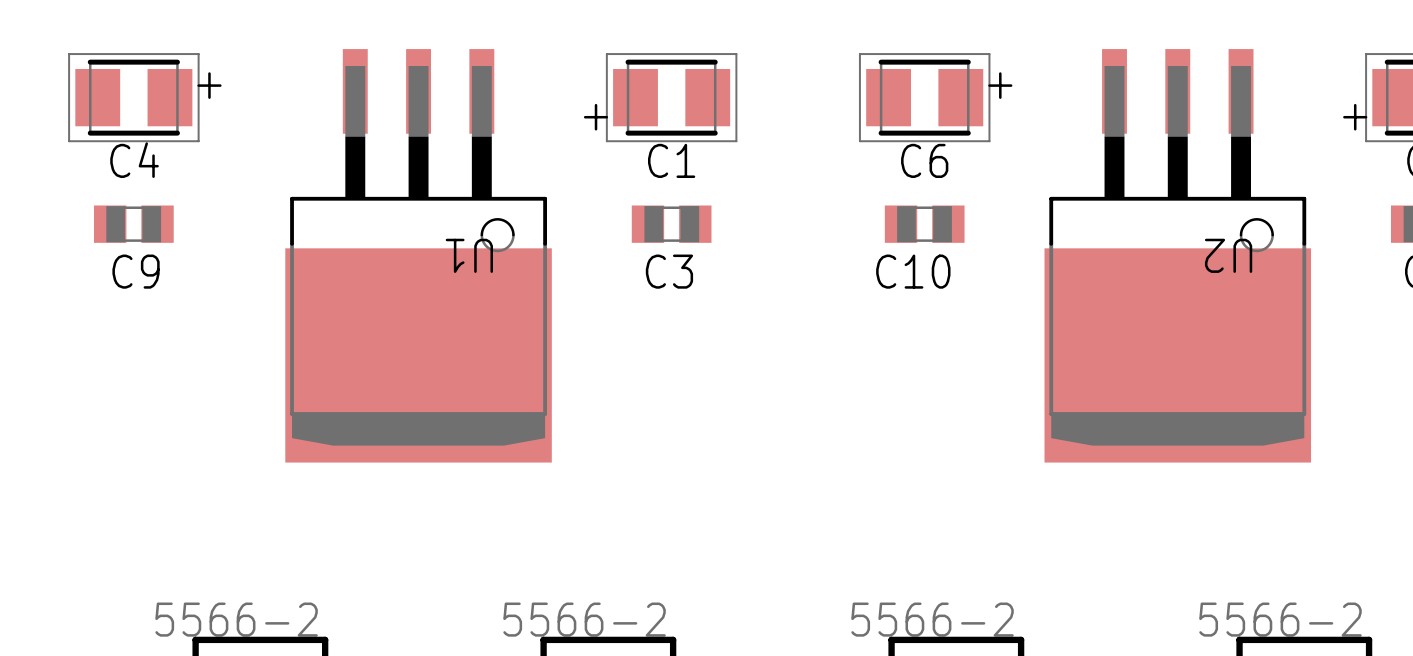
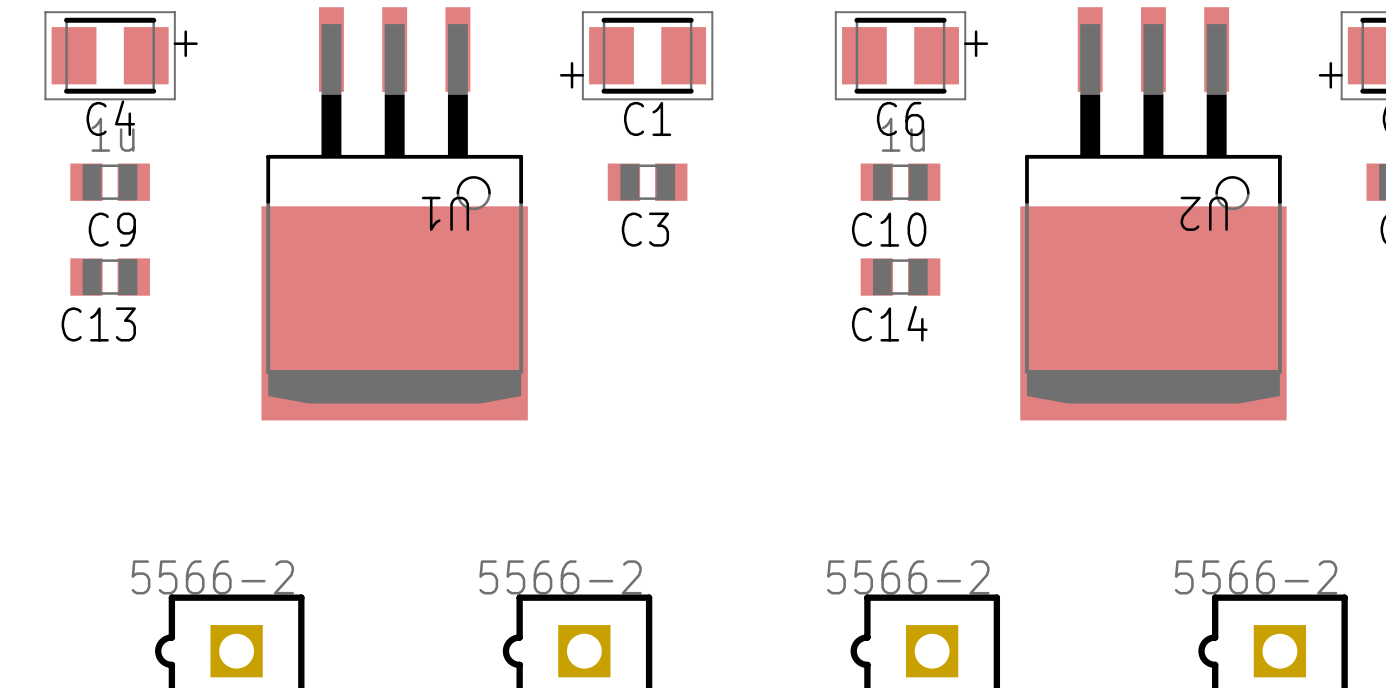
C9 value: none -> 1u (112, 134)
C10 value: none -> 1u (903, 134)
C13: none -> (110, 277)
C14: none -> (900, 277)

